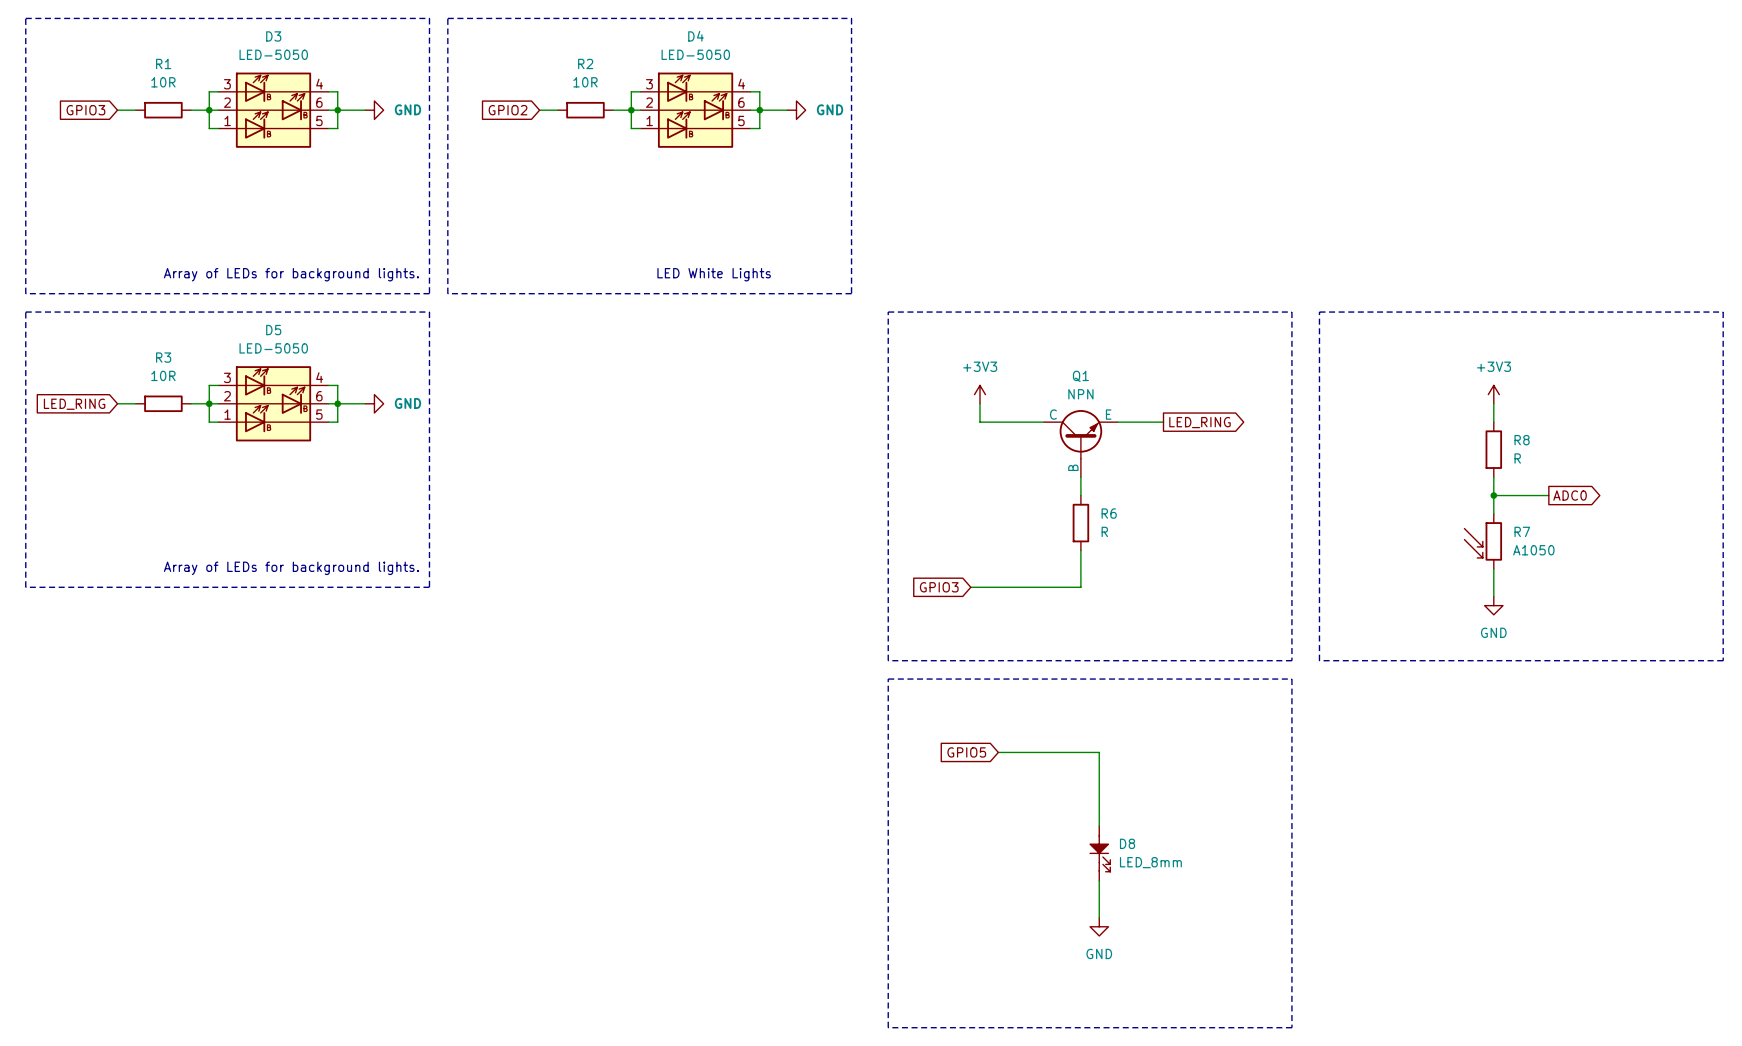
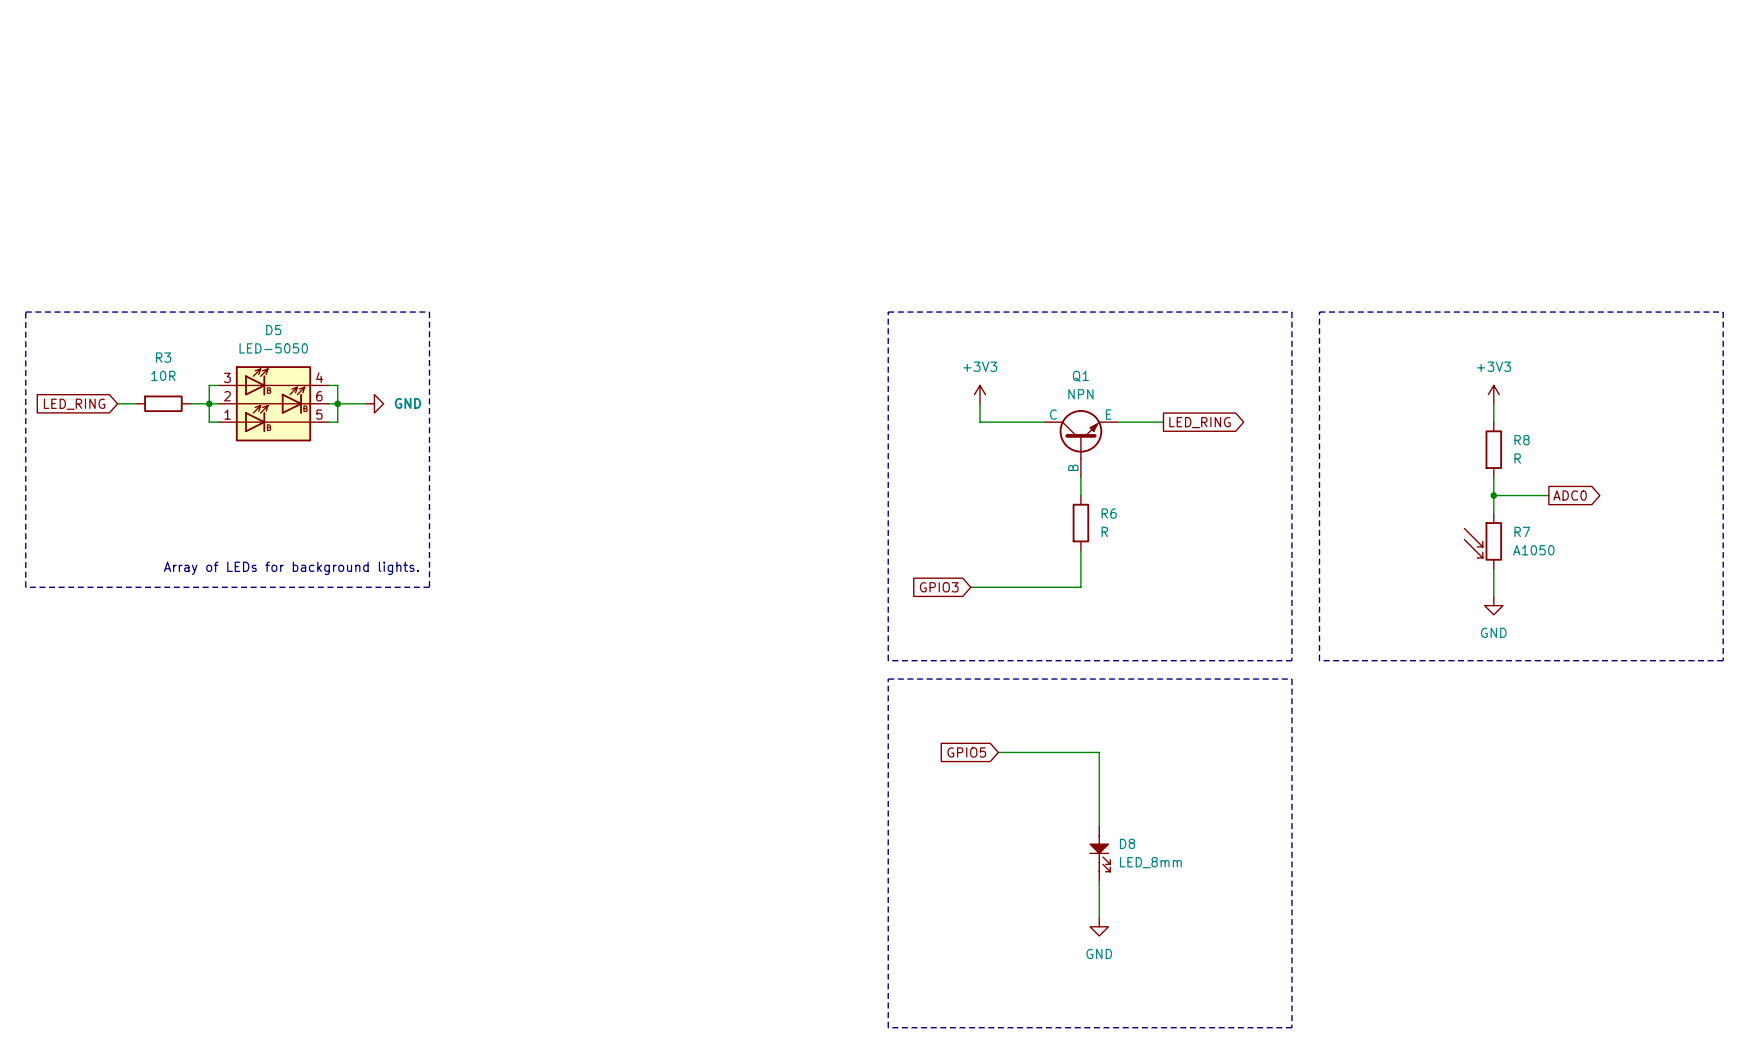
line: (25, 18) (429, 18) (429, 293) (25, 293) (25, 18) -> none
line: (447, 18) (851, 18) (851, 293) (447, 293) (447, 18) -> none
wire: (218, 91) (209, 91) (209, 128) (218, 128) -> none
wire: (328, 91) (337, 91) (337, 128) (328, 128) -> none
wire: (640, 91) (631, 91) (631, 128) (640, 128) -> none
wire: (750, 91) (759, 91) (759, 128) (750, 128) -> none
global label: GPIO3 (85, 110) -> none
wire: (117, 110) (135, 110) -> none
R1: 10R (163, 110) -> none
wire: (190, 110) (218, 110) -> none
junction: (209, 110) -> none
D3: LED-5050 (273, 110) -> none
wire: (328, 110) (365, 110) -> none
junction: (337, 110) -> none
power symbol: GND (374, 110) -> none
global label: GPIO2 (508, 110) -> none
wire: (539, 110) (557, 110) -> none
R2: 10R (585, 110) -> none
wire: (612, 110) (640, 110) -> none
junction: (631, 110) -> none
D4: LED-5050 (695, 110) -> none
wire: (750, 110) (787, 110) -> none
junction: (759, 110) -> none
power symbol: GND (796, 110) -> none
text: Array of LEDs for background lights. (291, 274) -> none
text: LED White Lights (714, 274) -> none

